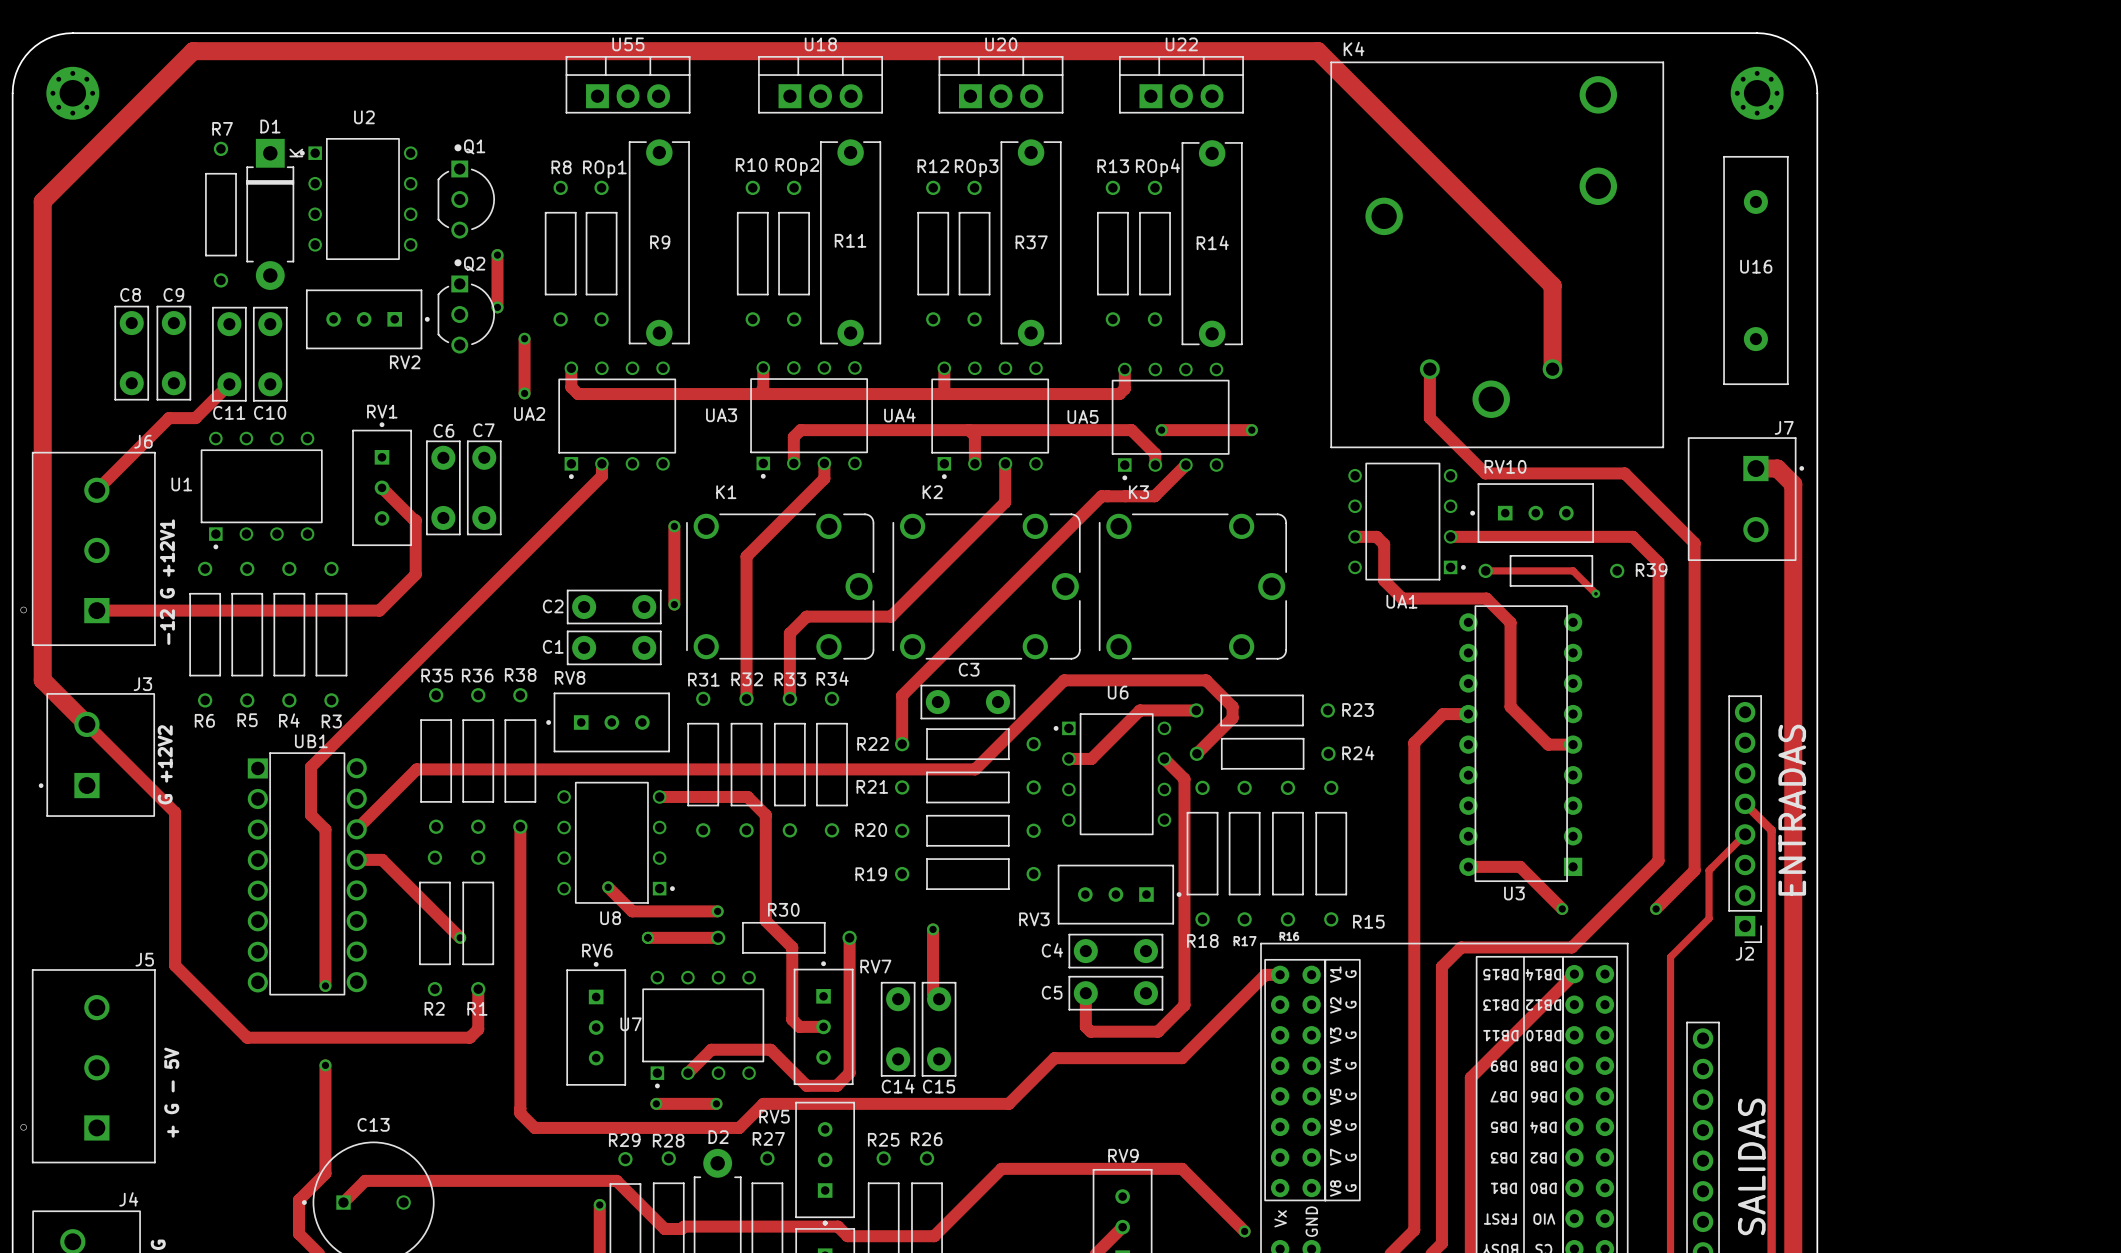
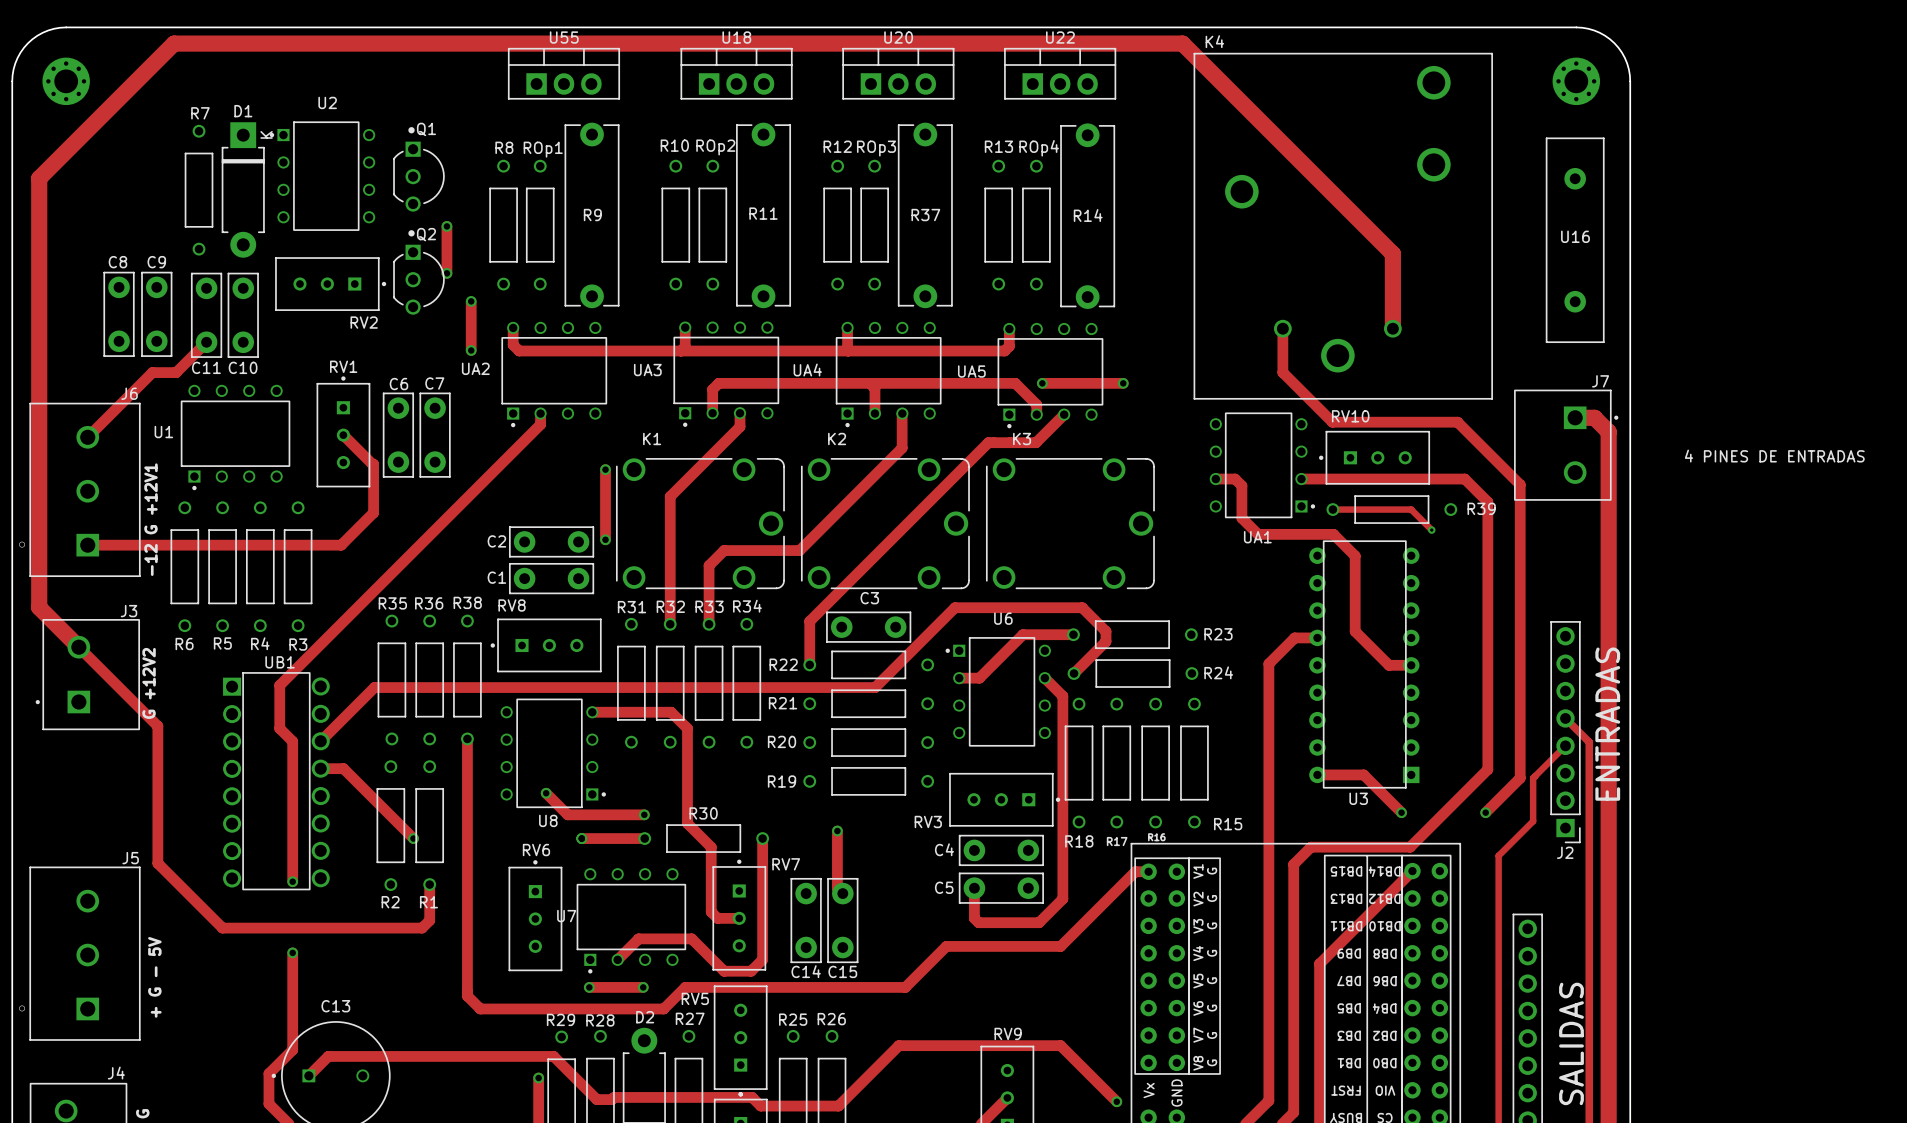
text: none -> 4 PINES DE ENTRADAS (1774, 456)

